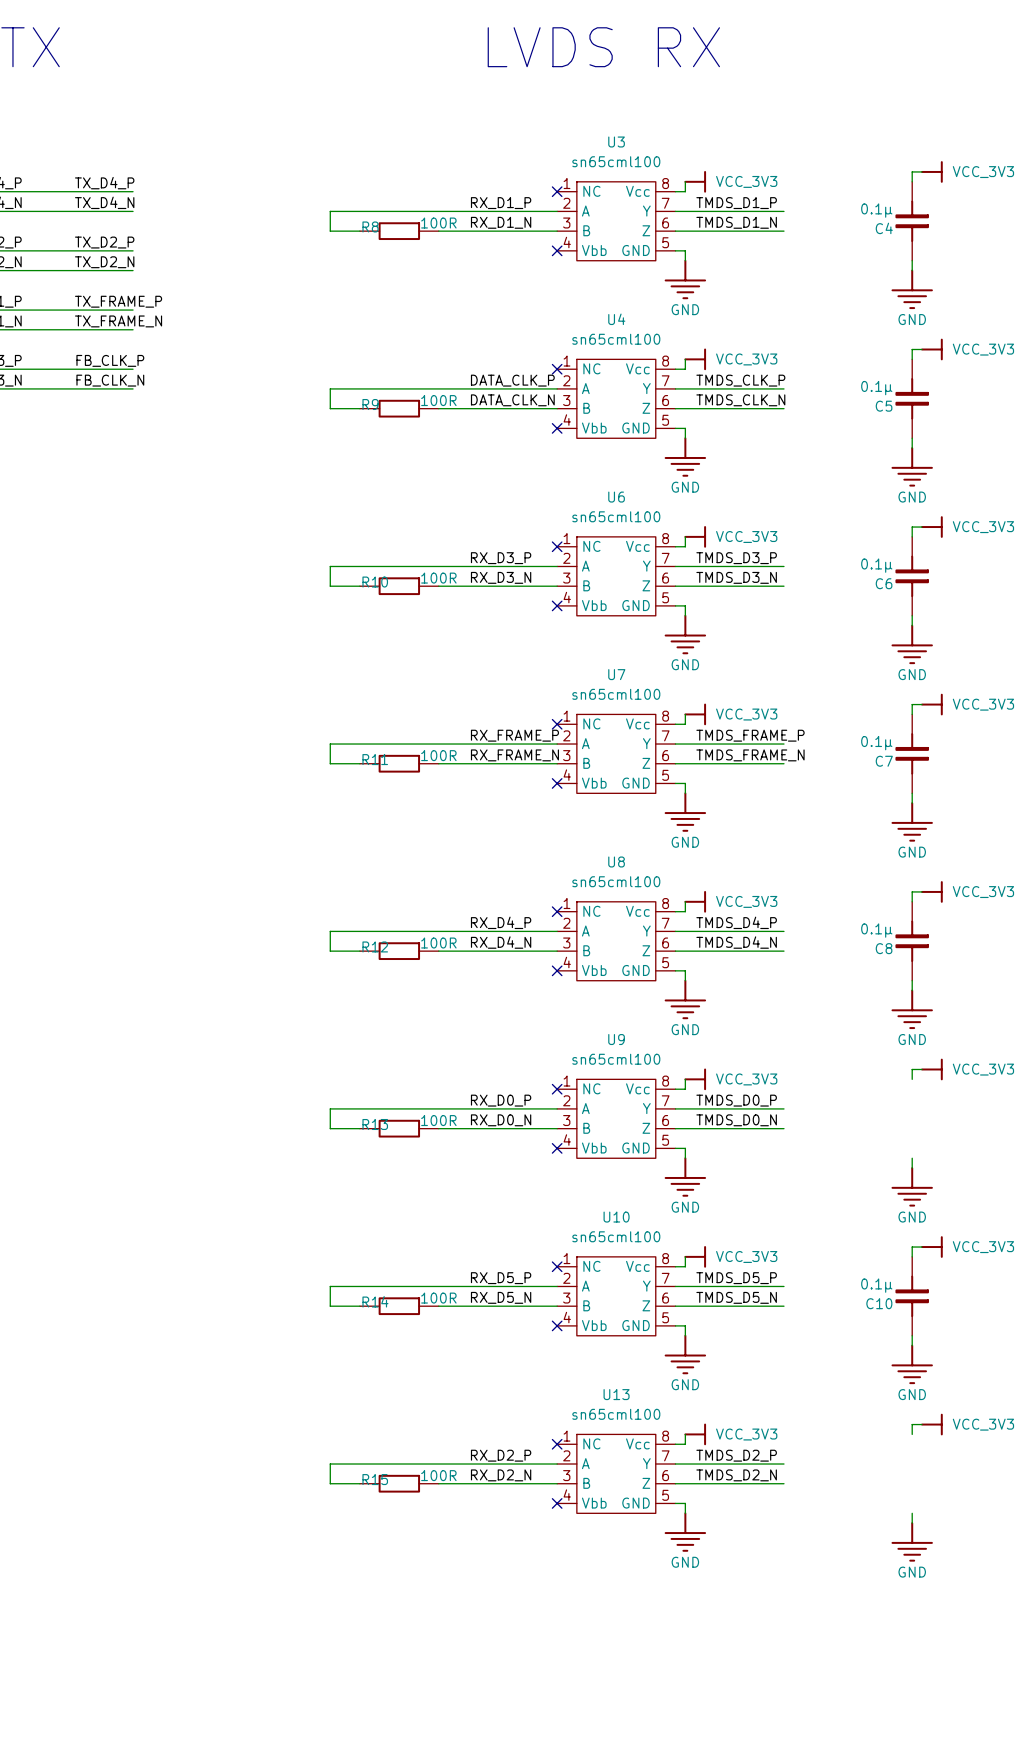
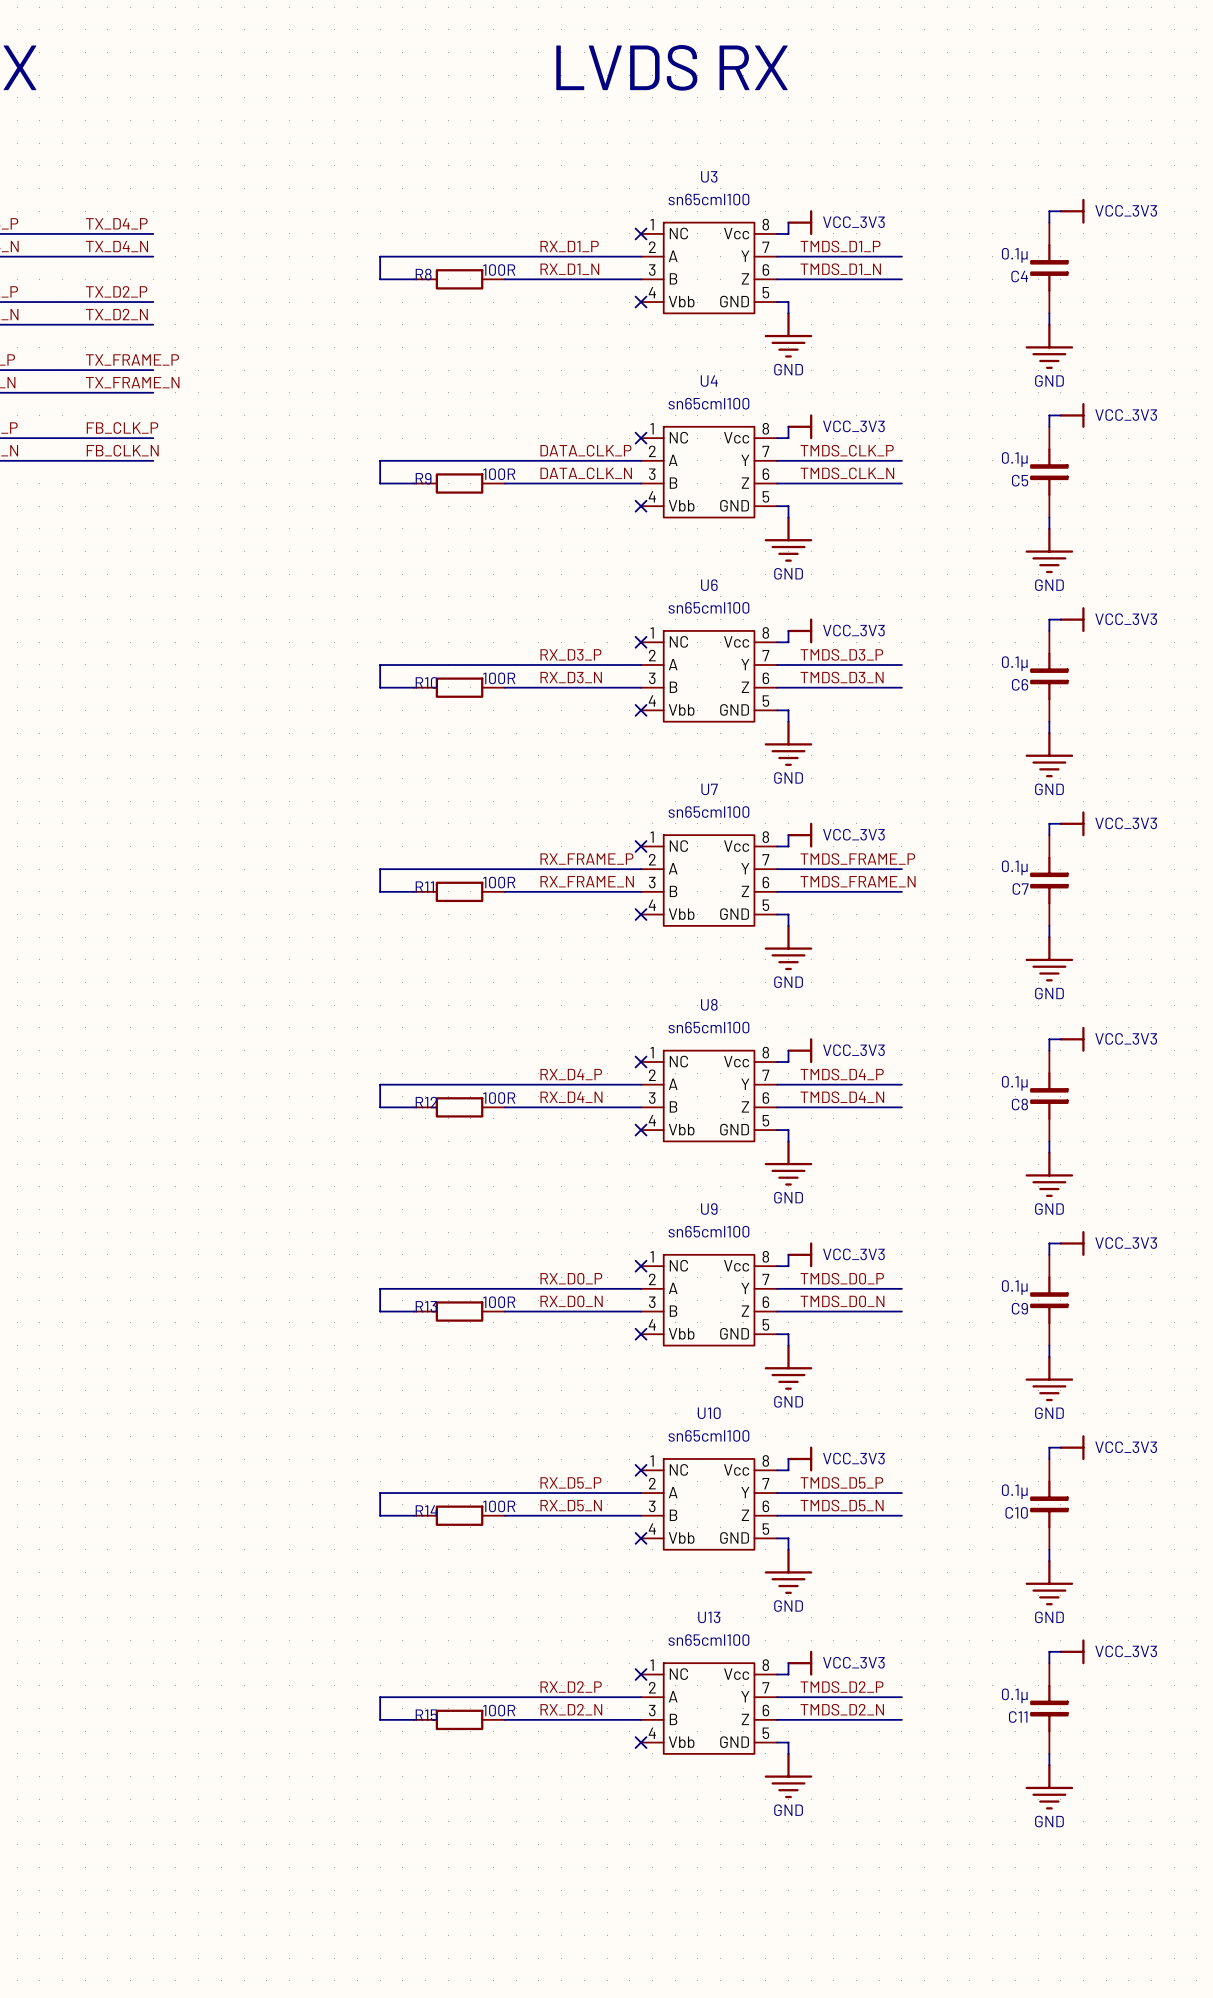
C9: none -> 0.1μ (1049, 1300)
C11: none -> 0.1μ (1049, 1708)

